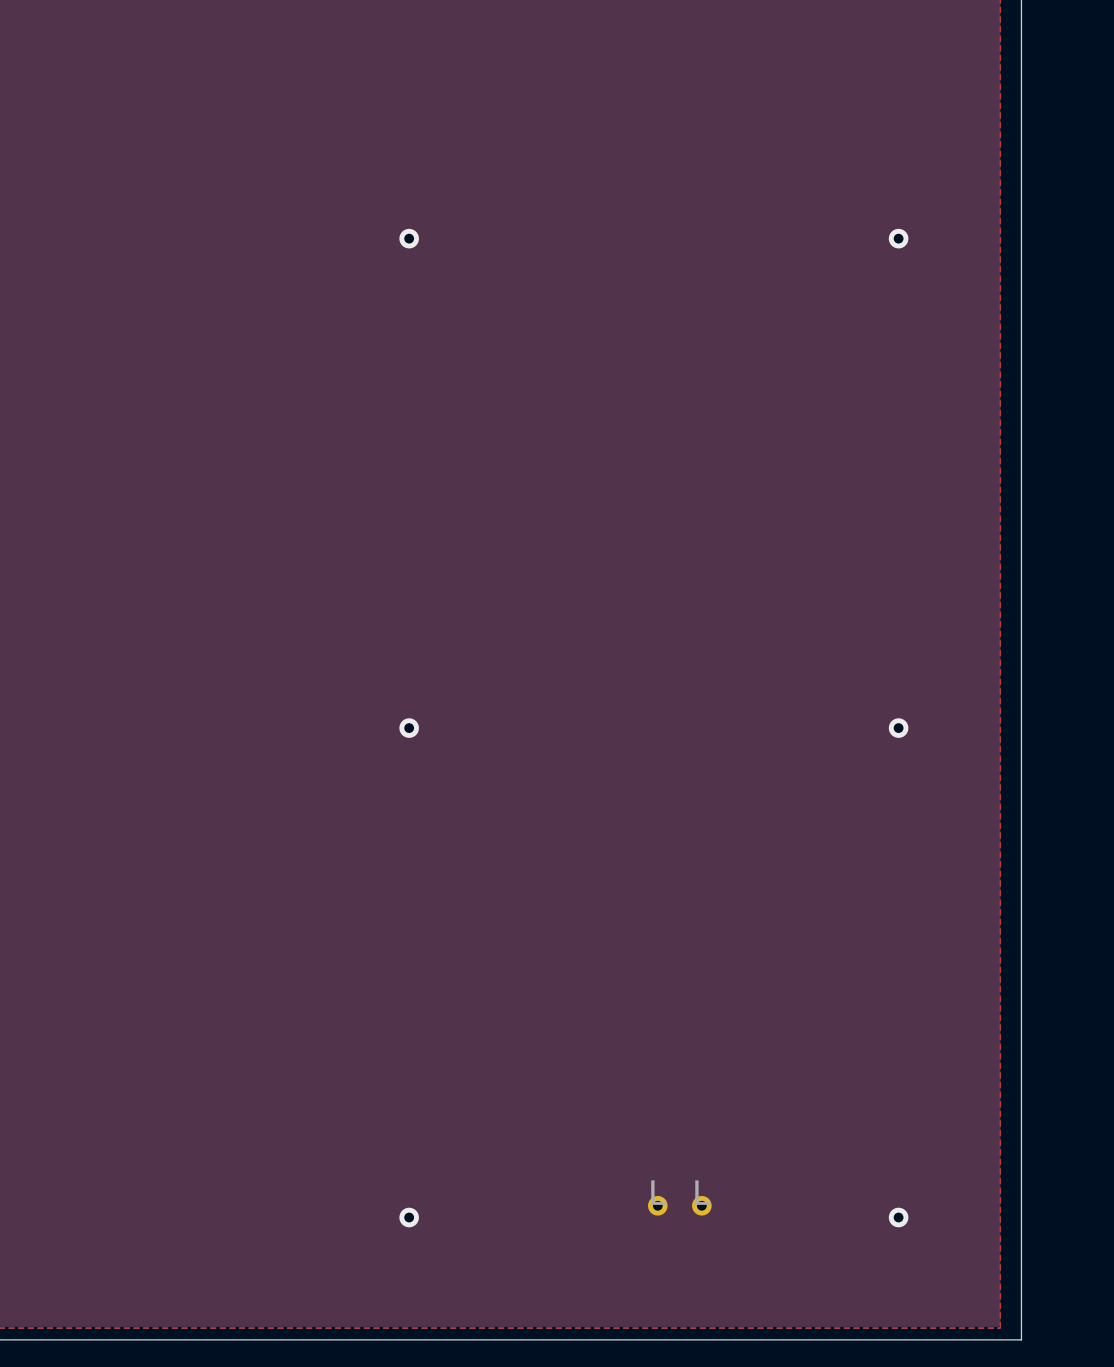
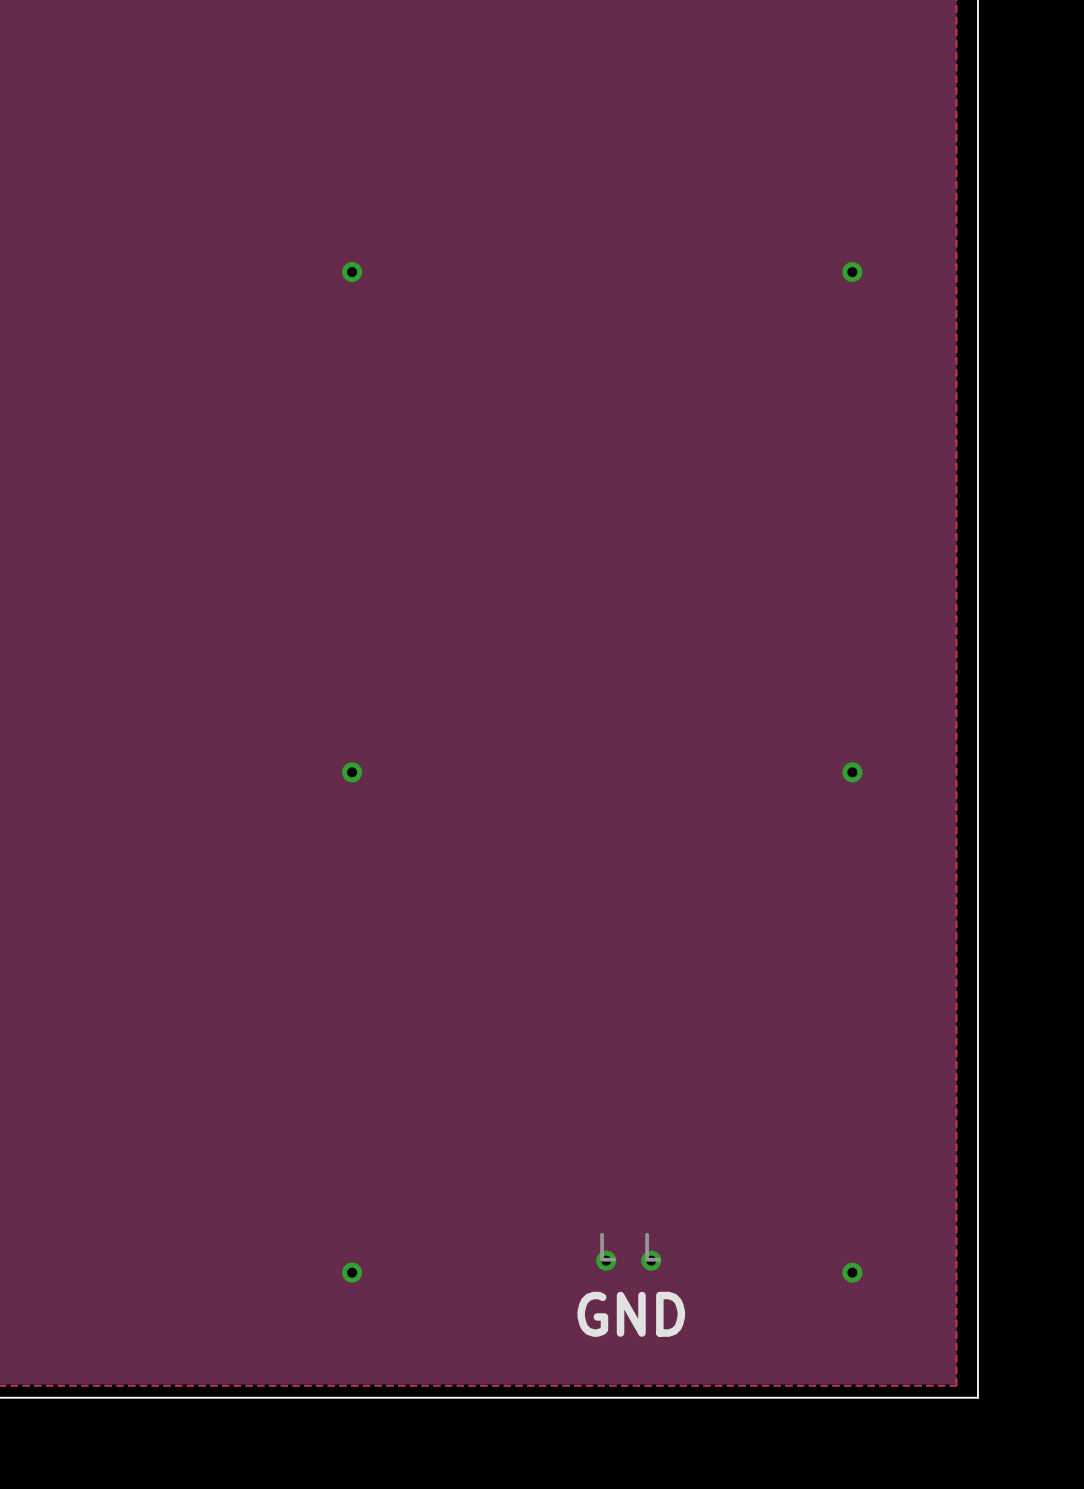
text: none -> GND (631, 1314)

